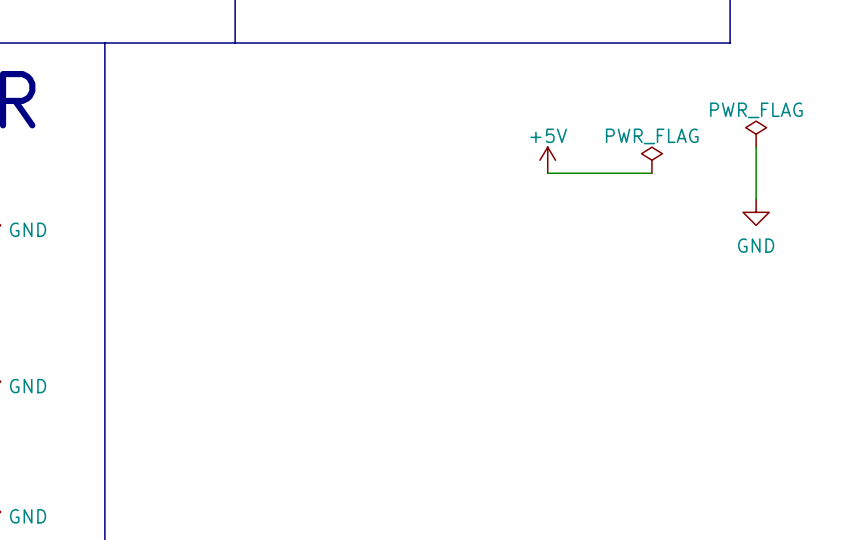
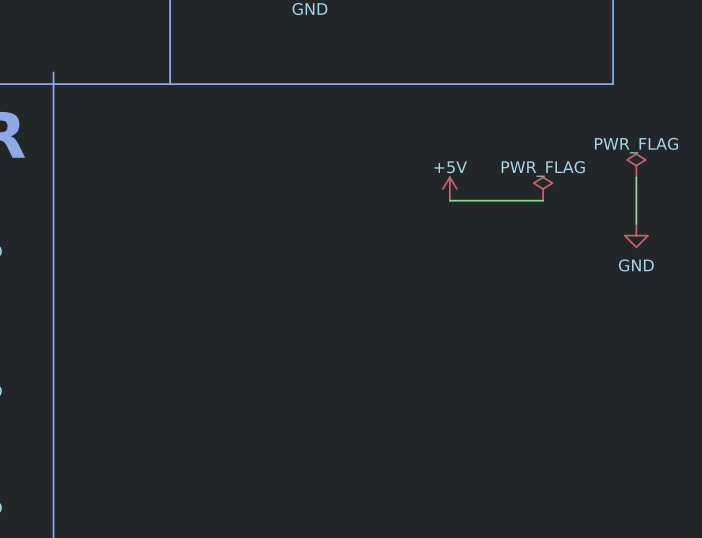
line: none -> (53, 72) (53, 84)

